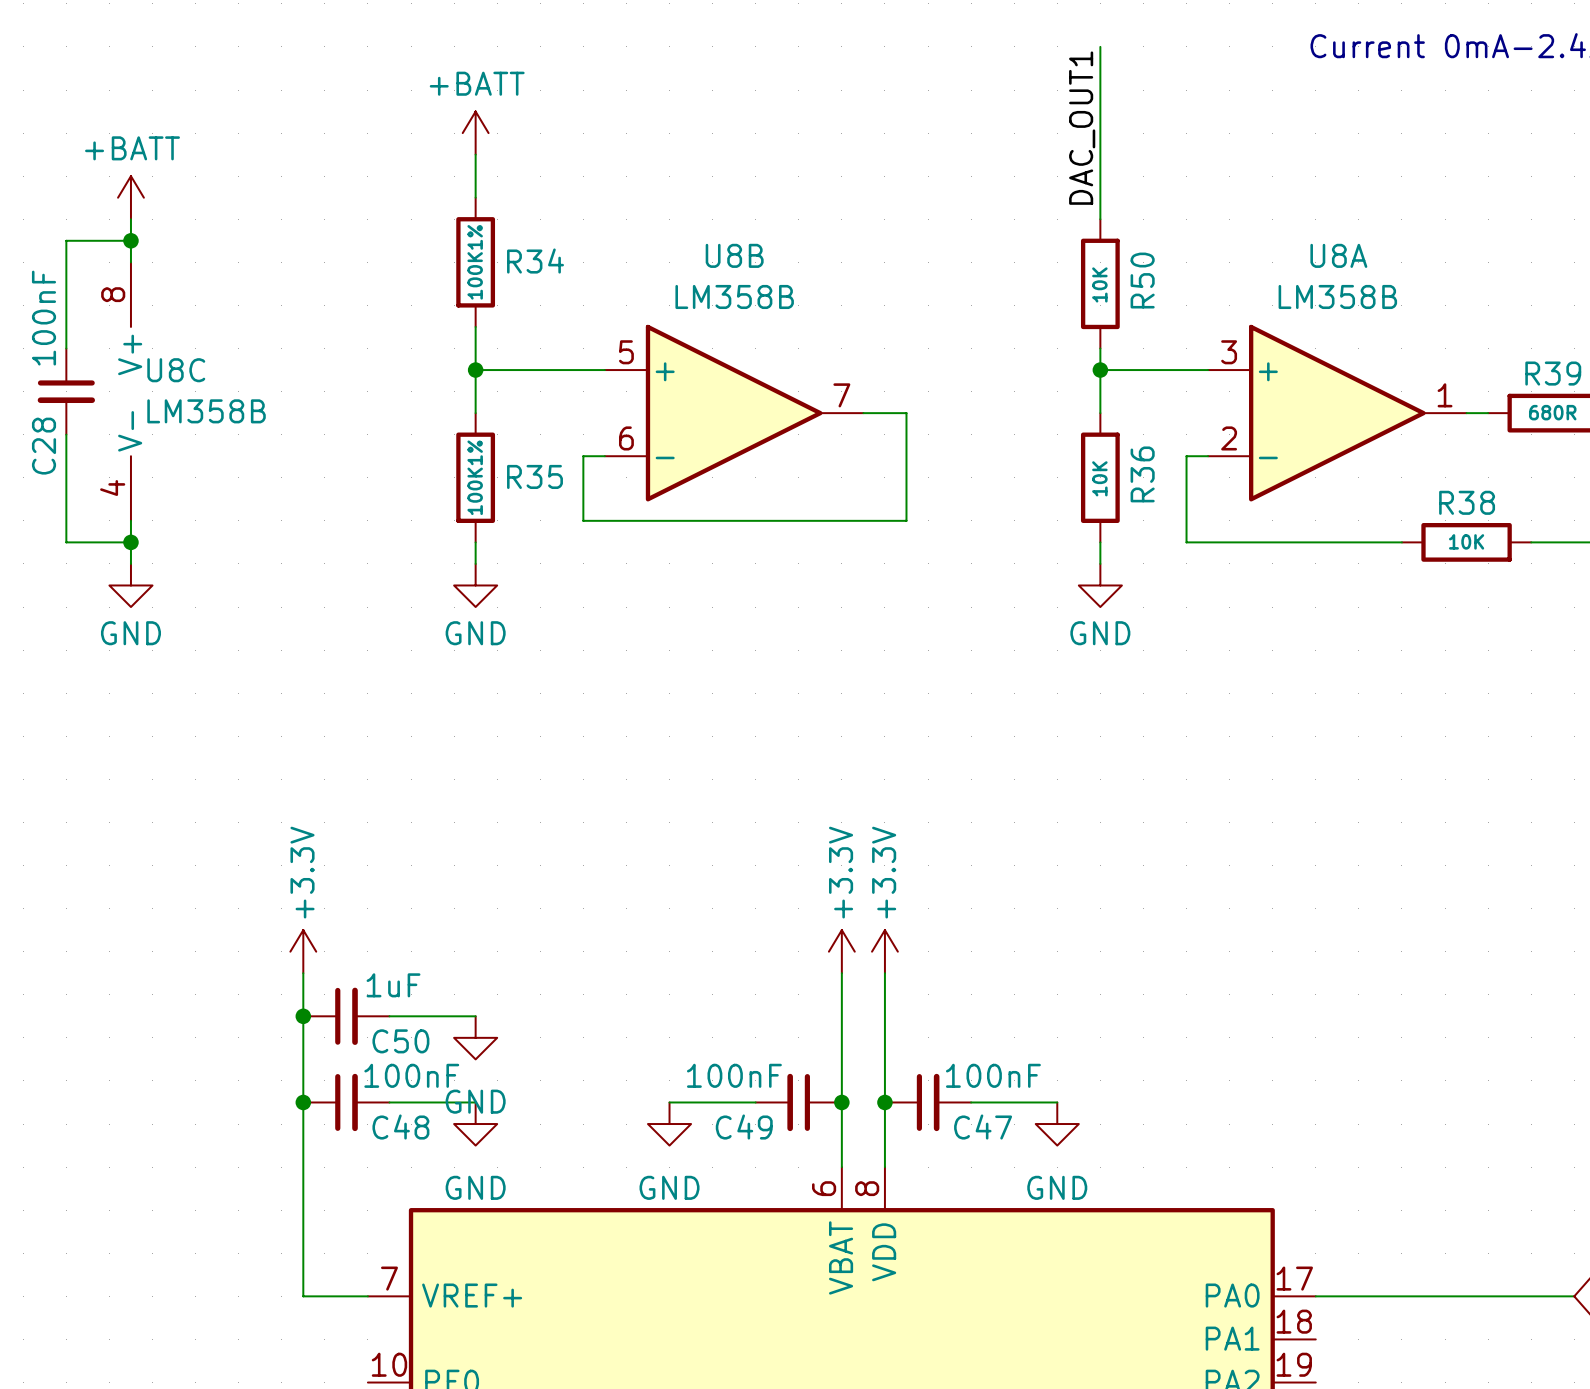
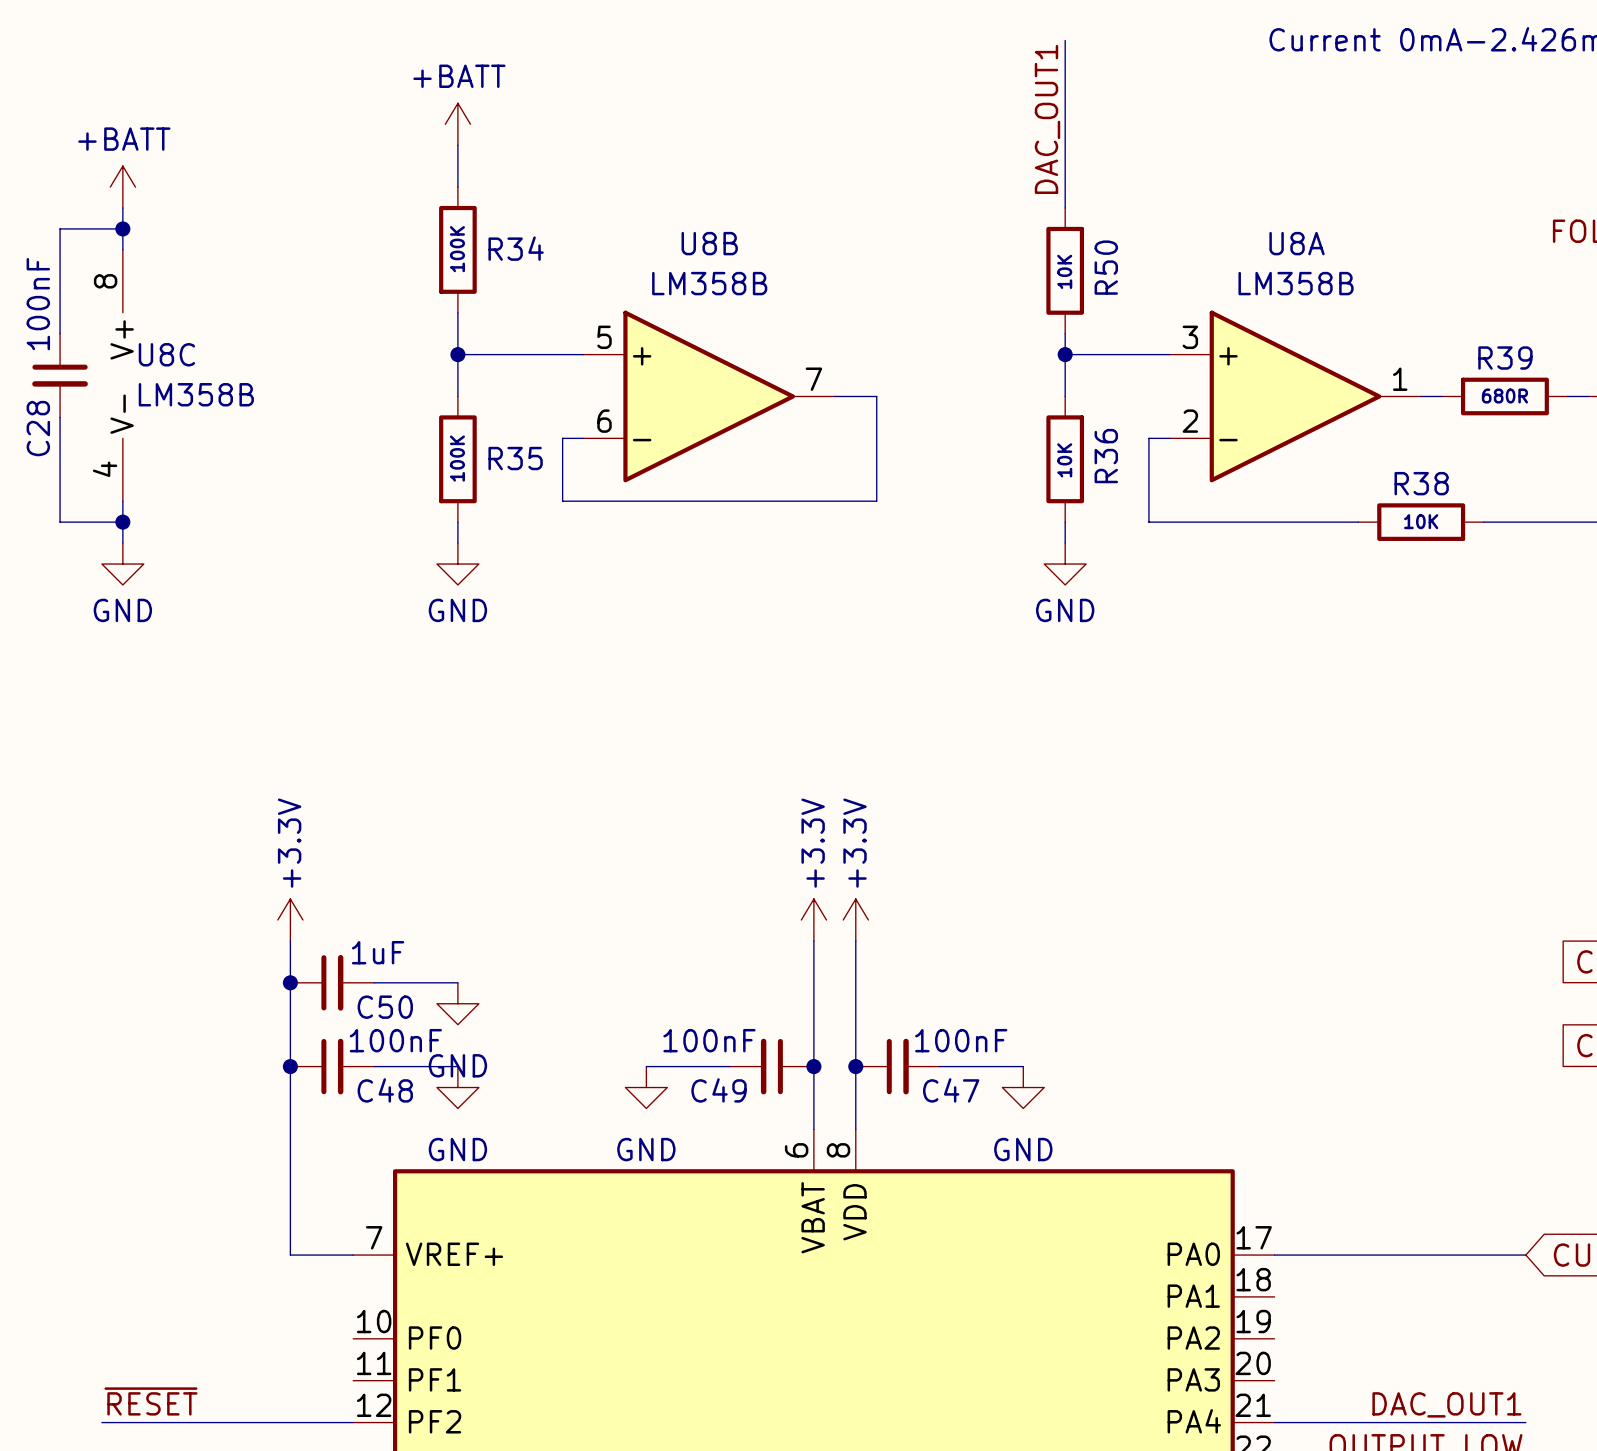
R34 value: 100K1% (475, 262) -> 100K (457, 249)
R35 value: 100K1% (475, 477) -> 100K (457, 458)

